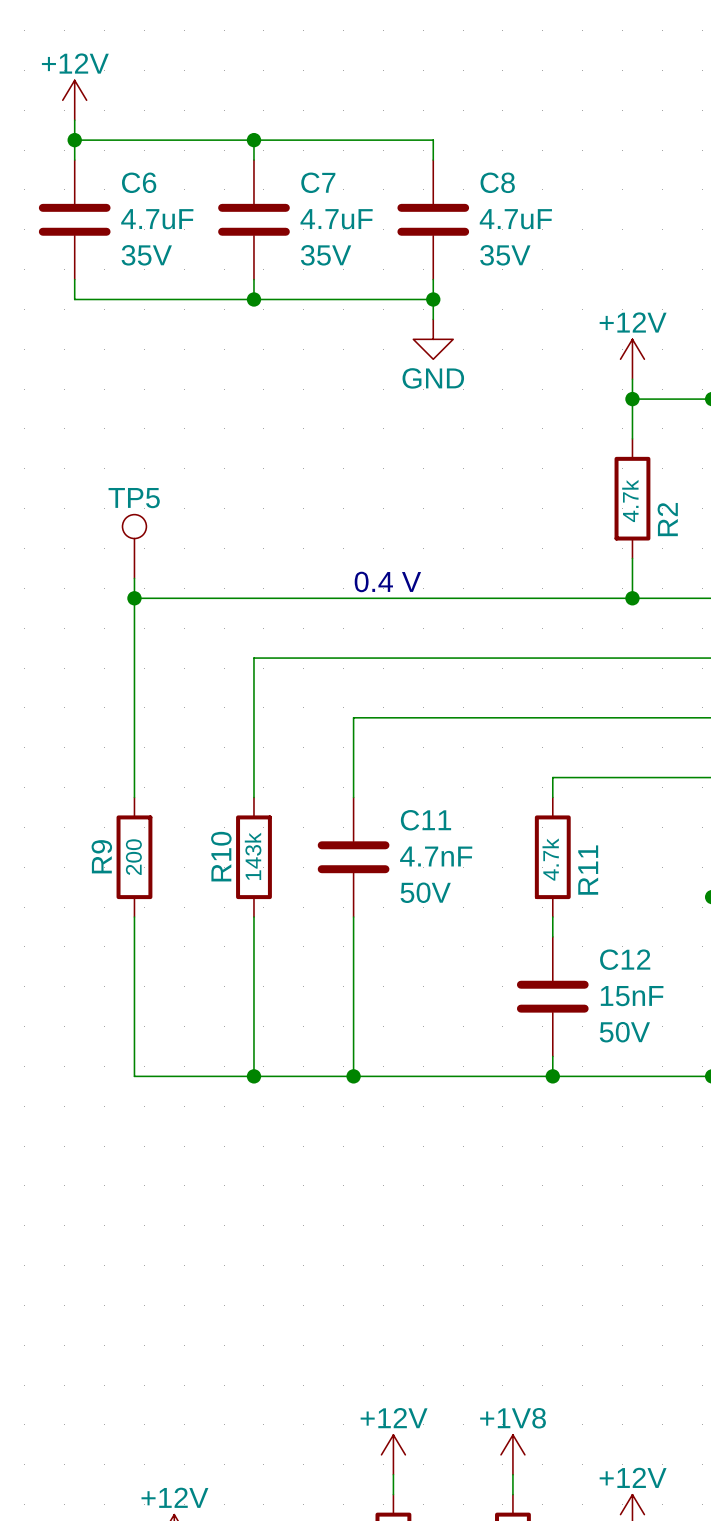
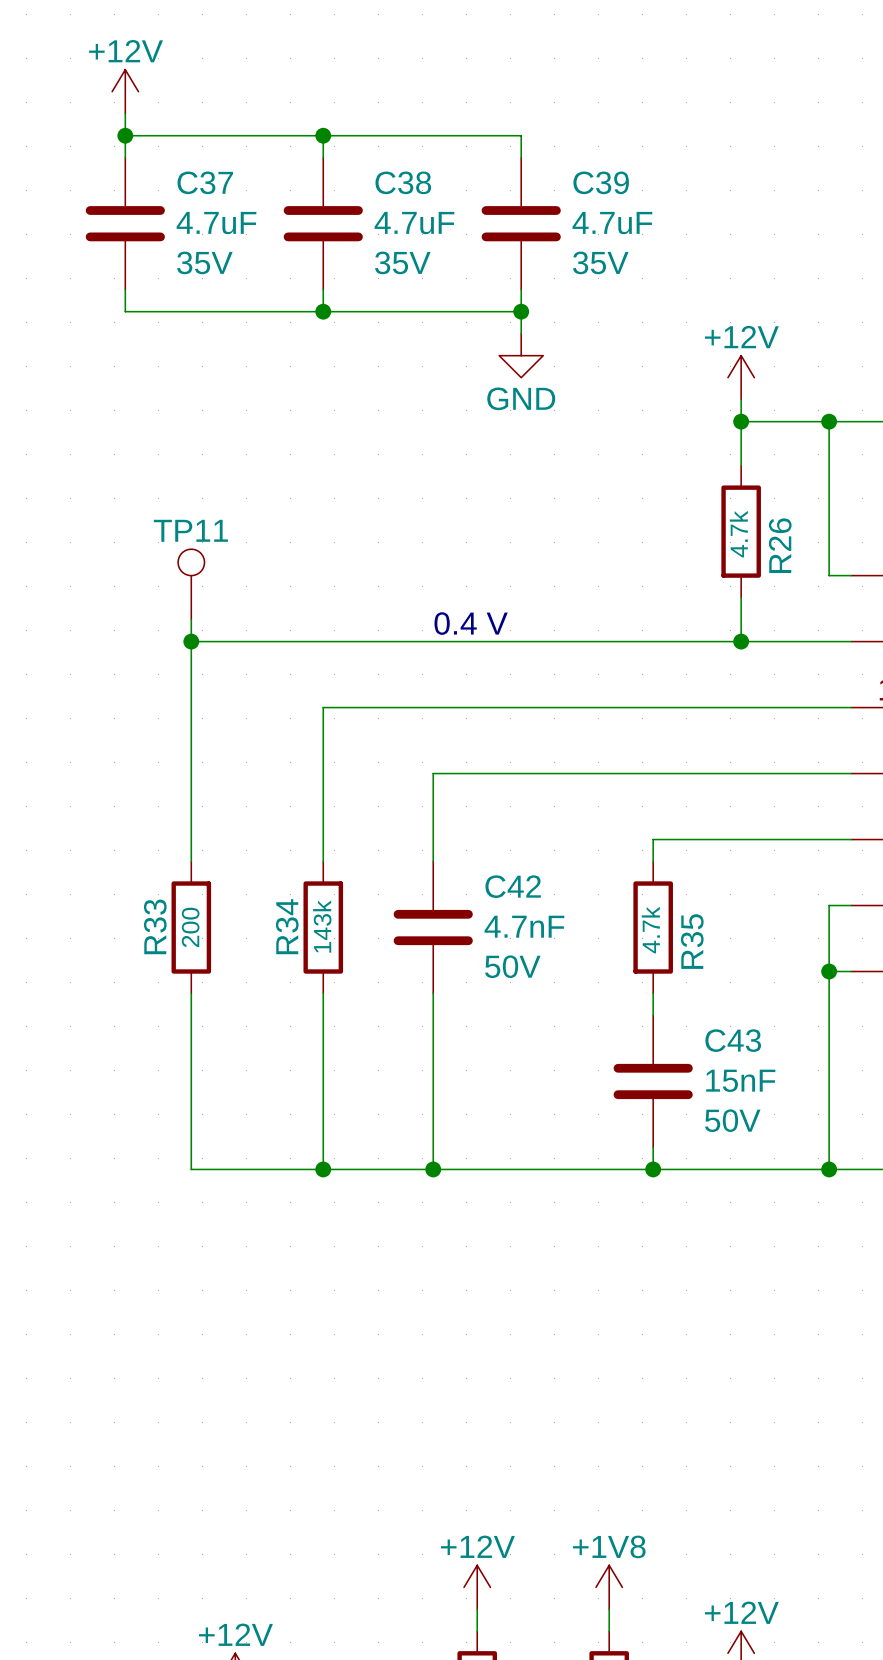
C6 name: C6 (139, 182) -> C37 (205, 182)
C7 name: C7 (318, 182) -> C38 (403, 182)
C8 name: C8 (497, 182) -> C39 (601, 182)
TP5 name: TP5 (134, 498) -> TP11 (190, 530)
R2 name: R2 (667, 519) -> R26 (780, 545)
C11 name: C11 (425, 820) -> C42 (513, 886)
R9 name: R9 (101, 856) -> R33 (155, 926)
R10 name: R10 (221, 856) -> R34 (287, 926)
R11 name: R11 (588, 870) -> R35 (692, 941)
C12 name: C12 (625, 959) -> C43 (733, 1040)

